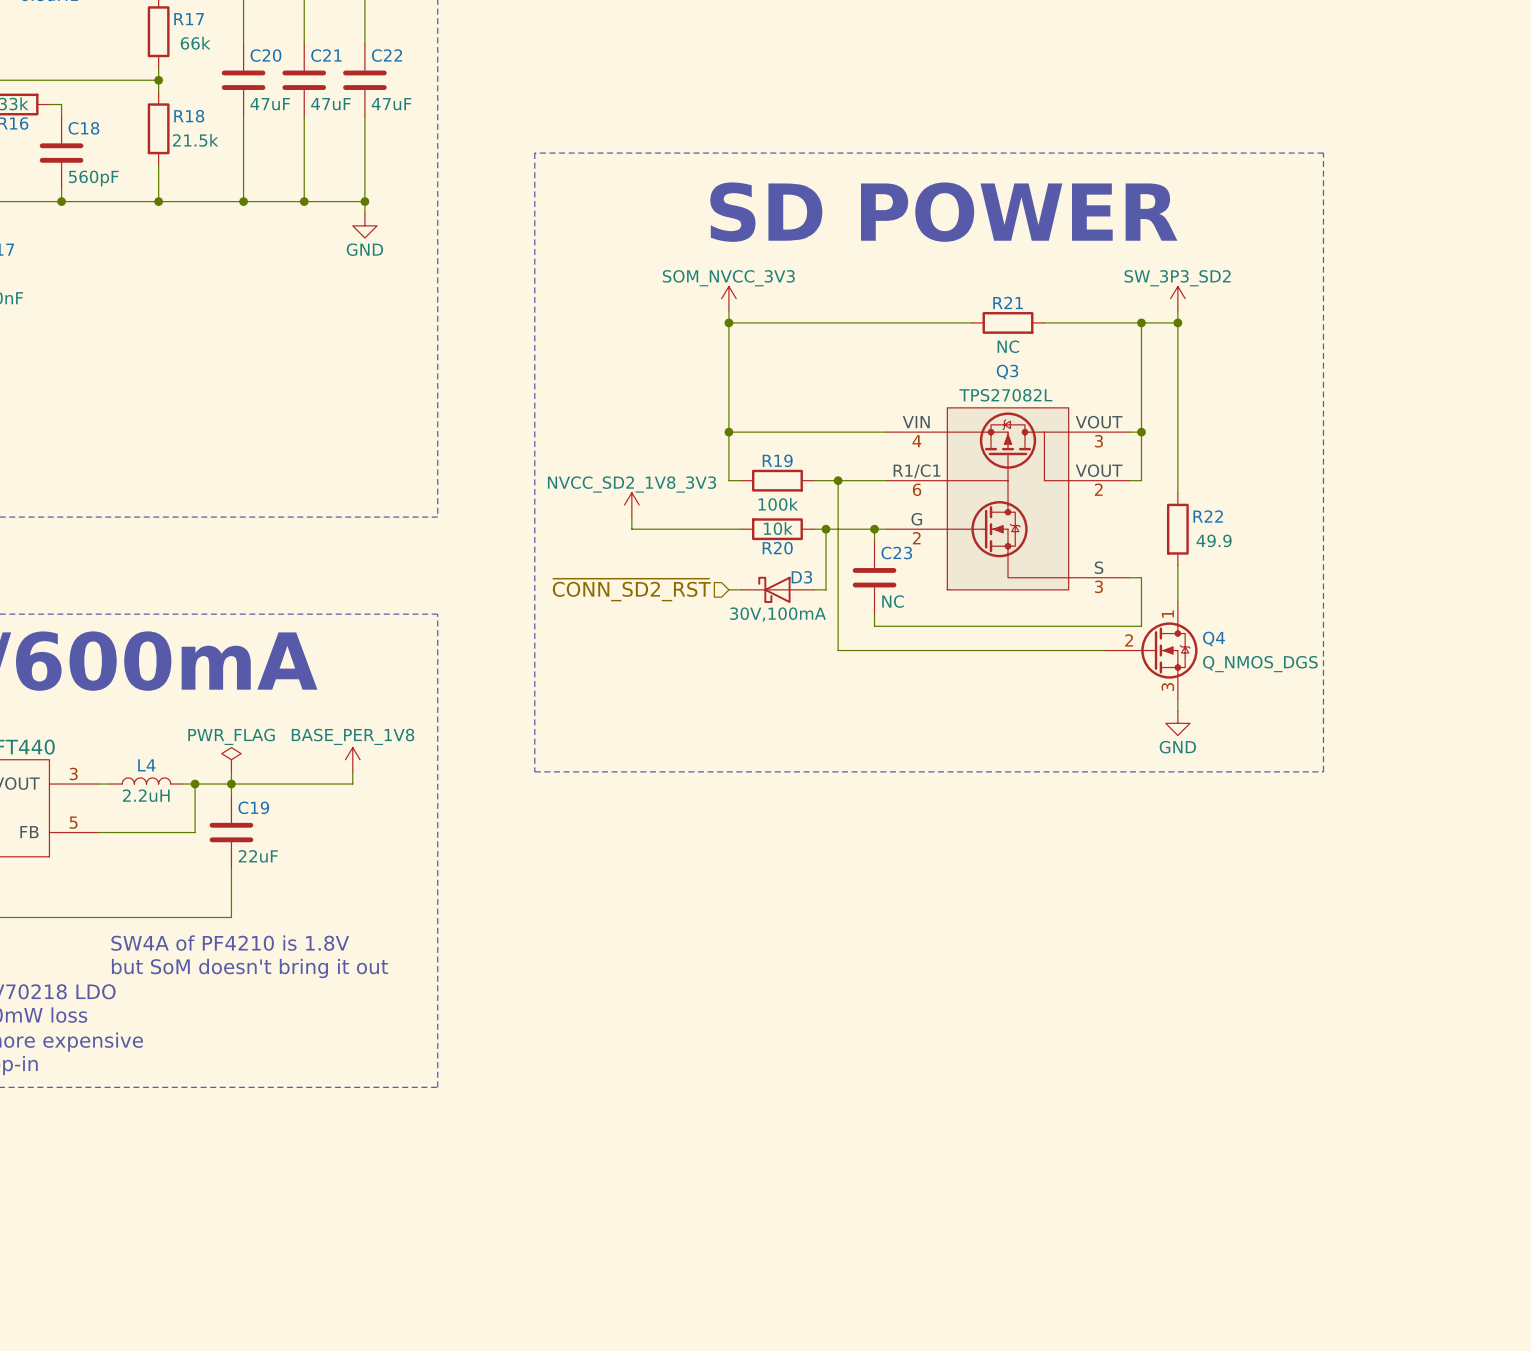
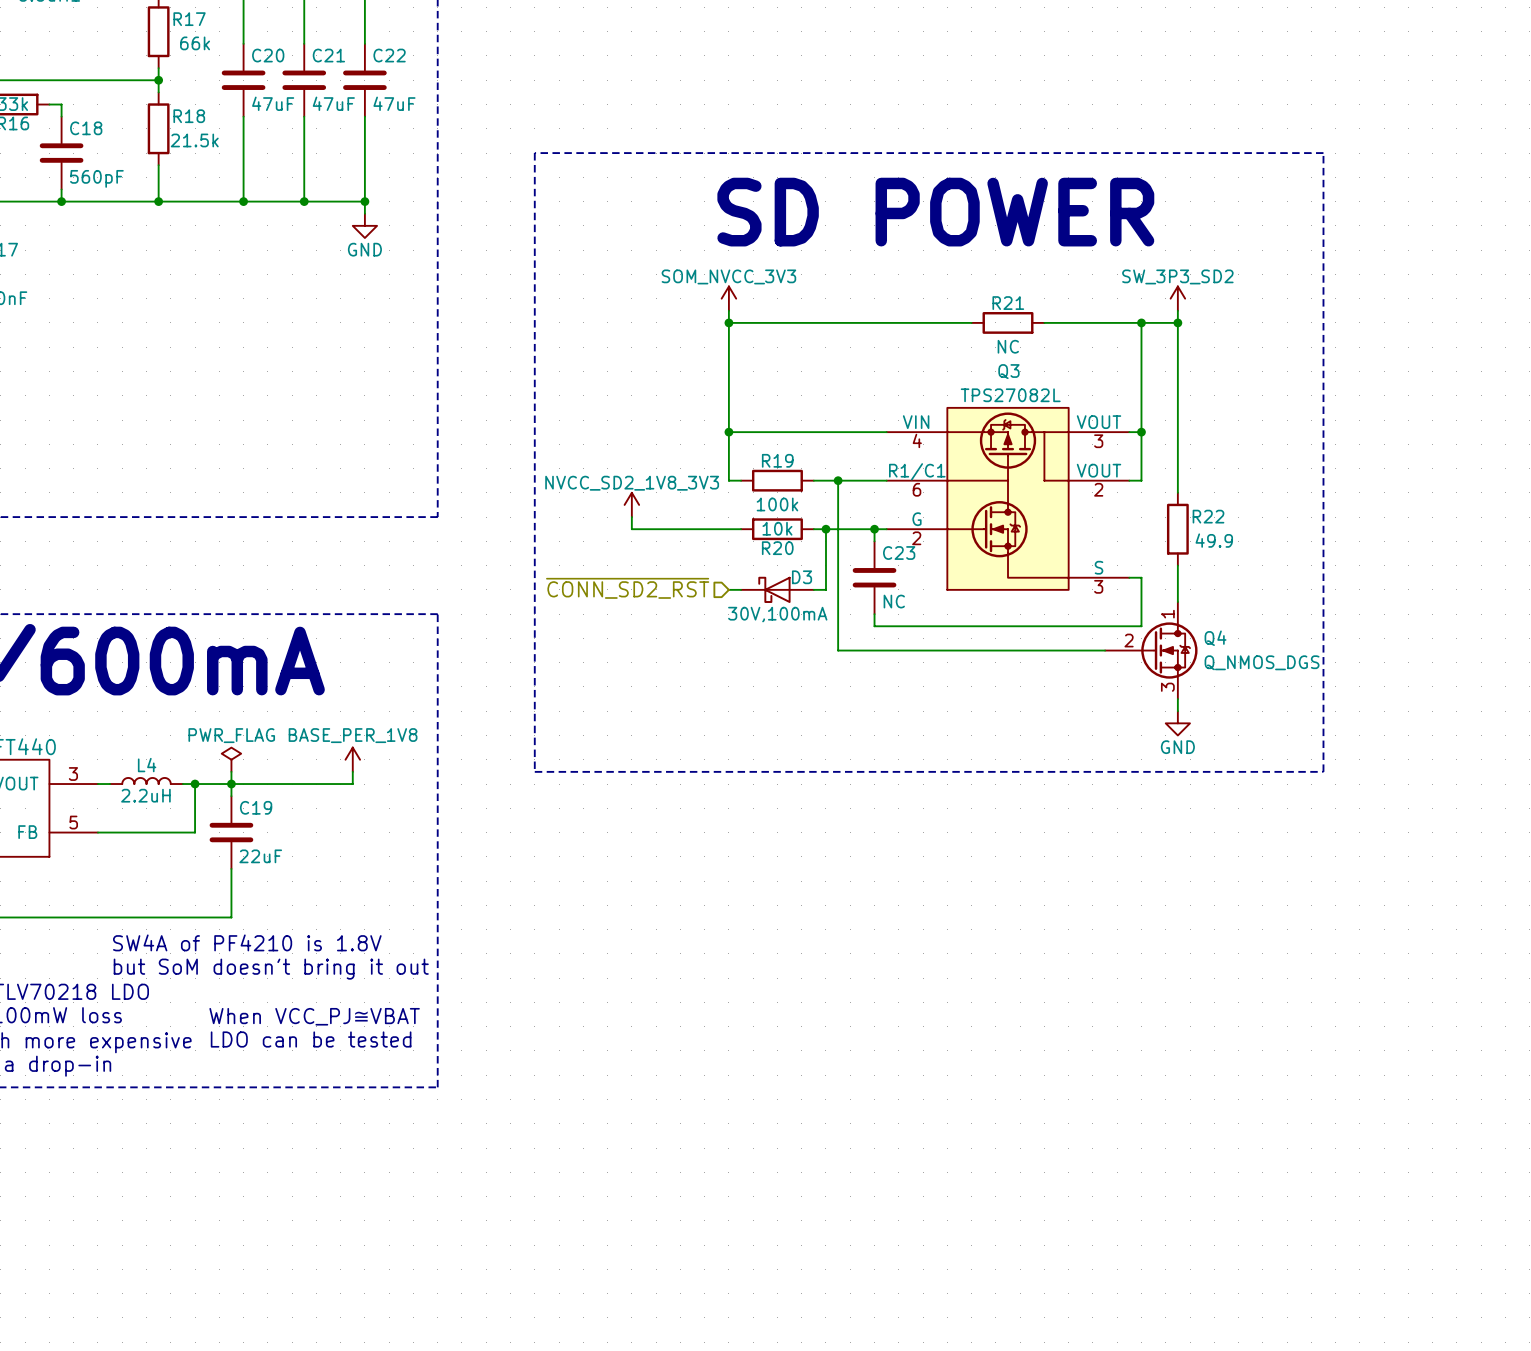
text: none -> When VCC_PJ≅VBAT (314, 1016)
text: none -> LDO can be tested (311, 1039)

